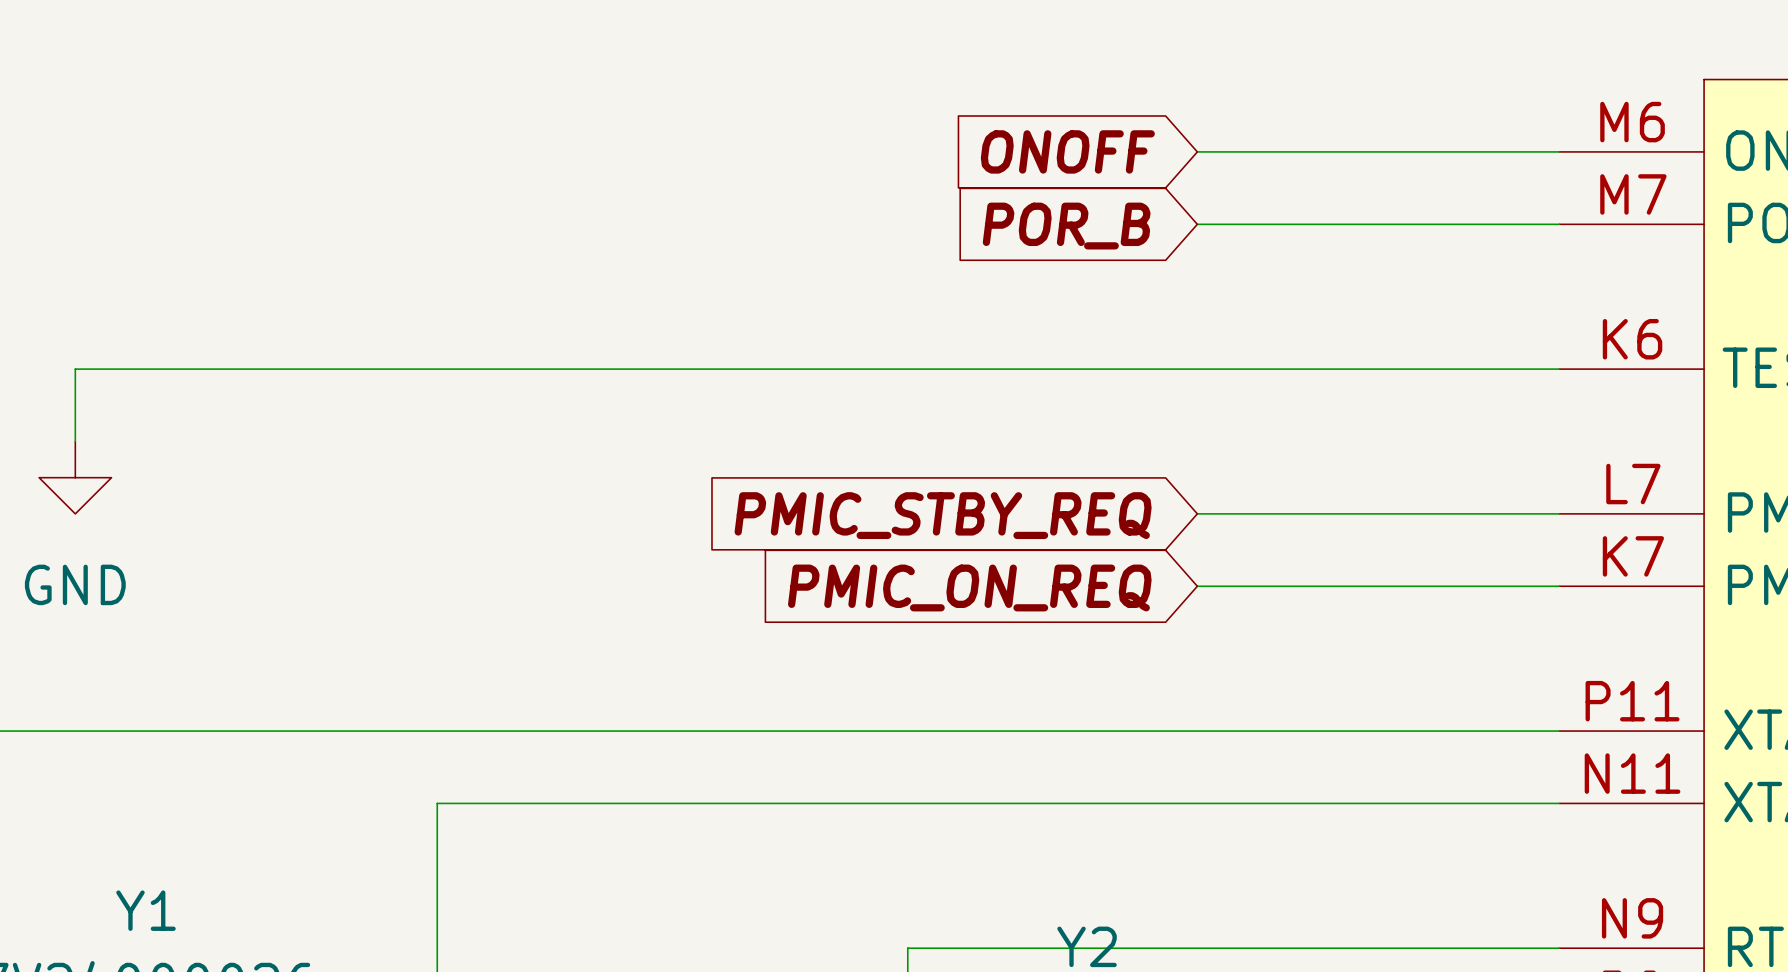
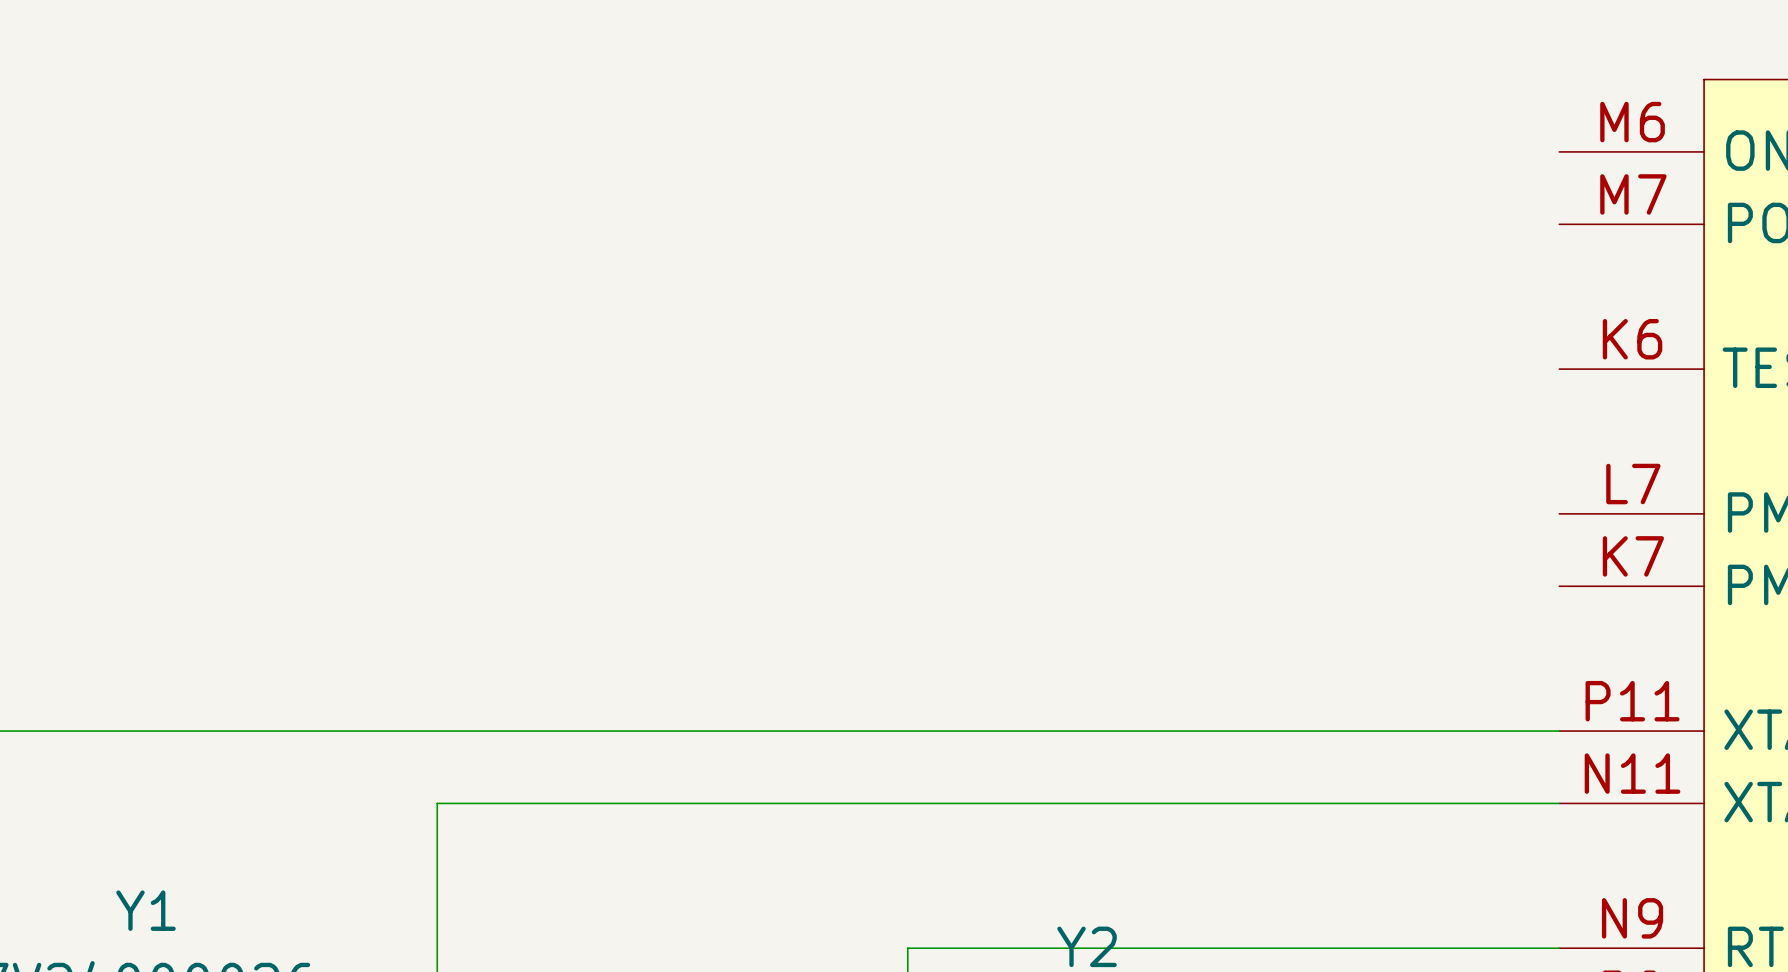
global label: ONOFF (1067, 151) -> none
wire: (1197, 151) (1559, 151) -> none
wire: (1197, 224) (1559, 224) -> none
global label: POR_B (1066, 226) -> none
wire: (1559, 369) (75, 369) (75, 441) -> none
power symbol: GND (75, 477) -> none
wire: (1197, 513) (1559, 513) -> none
global label: PMIC_STBY_REQ (943, 515) -> none
wire: (1197, 586) (1559, 586) -> none
global label: PMIC_ON_REQ (969, 587) -> none

